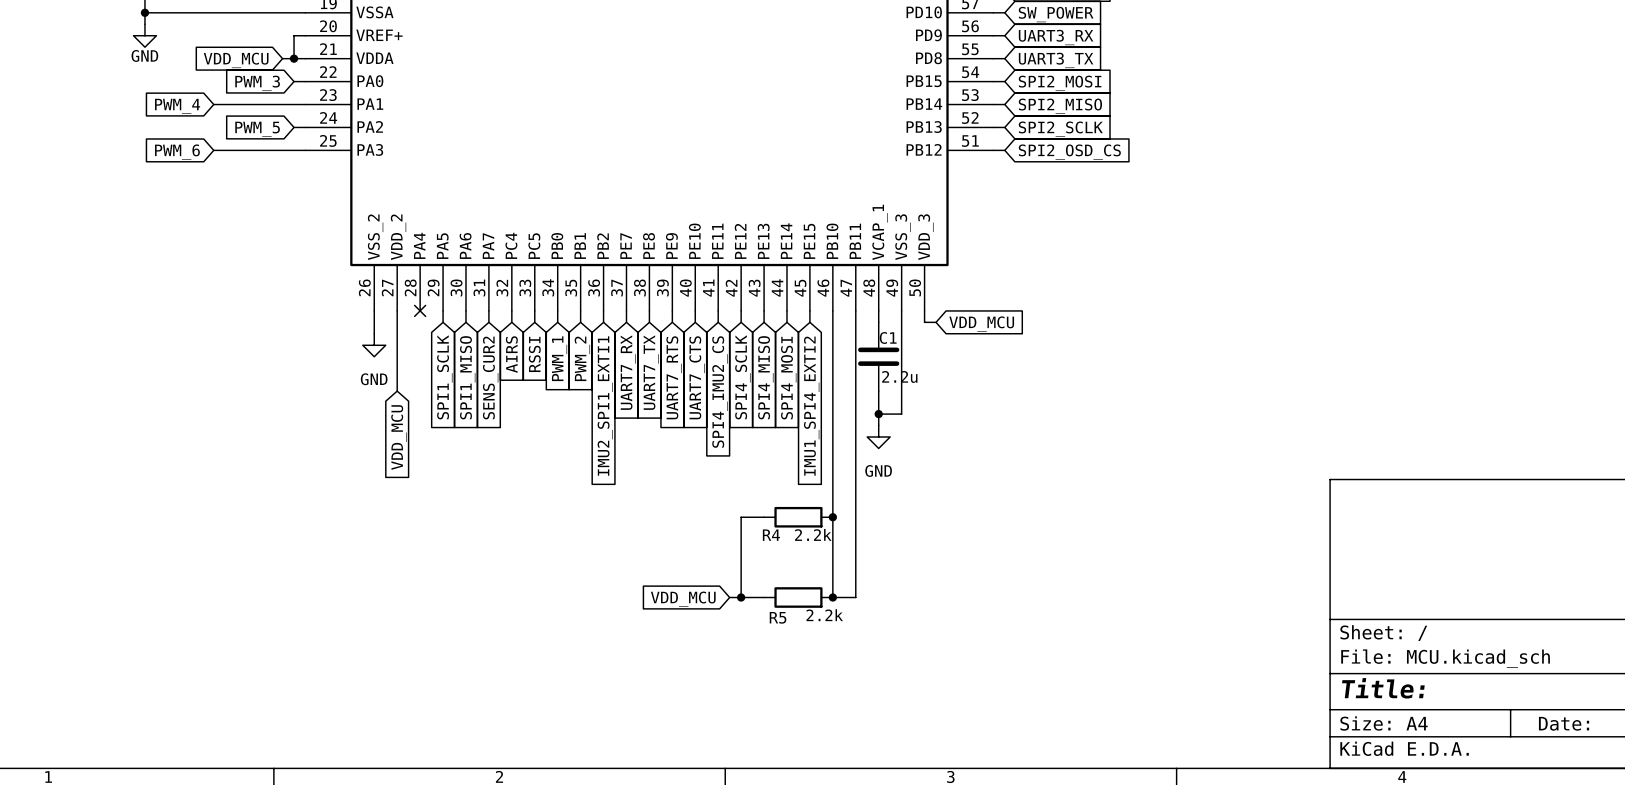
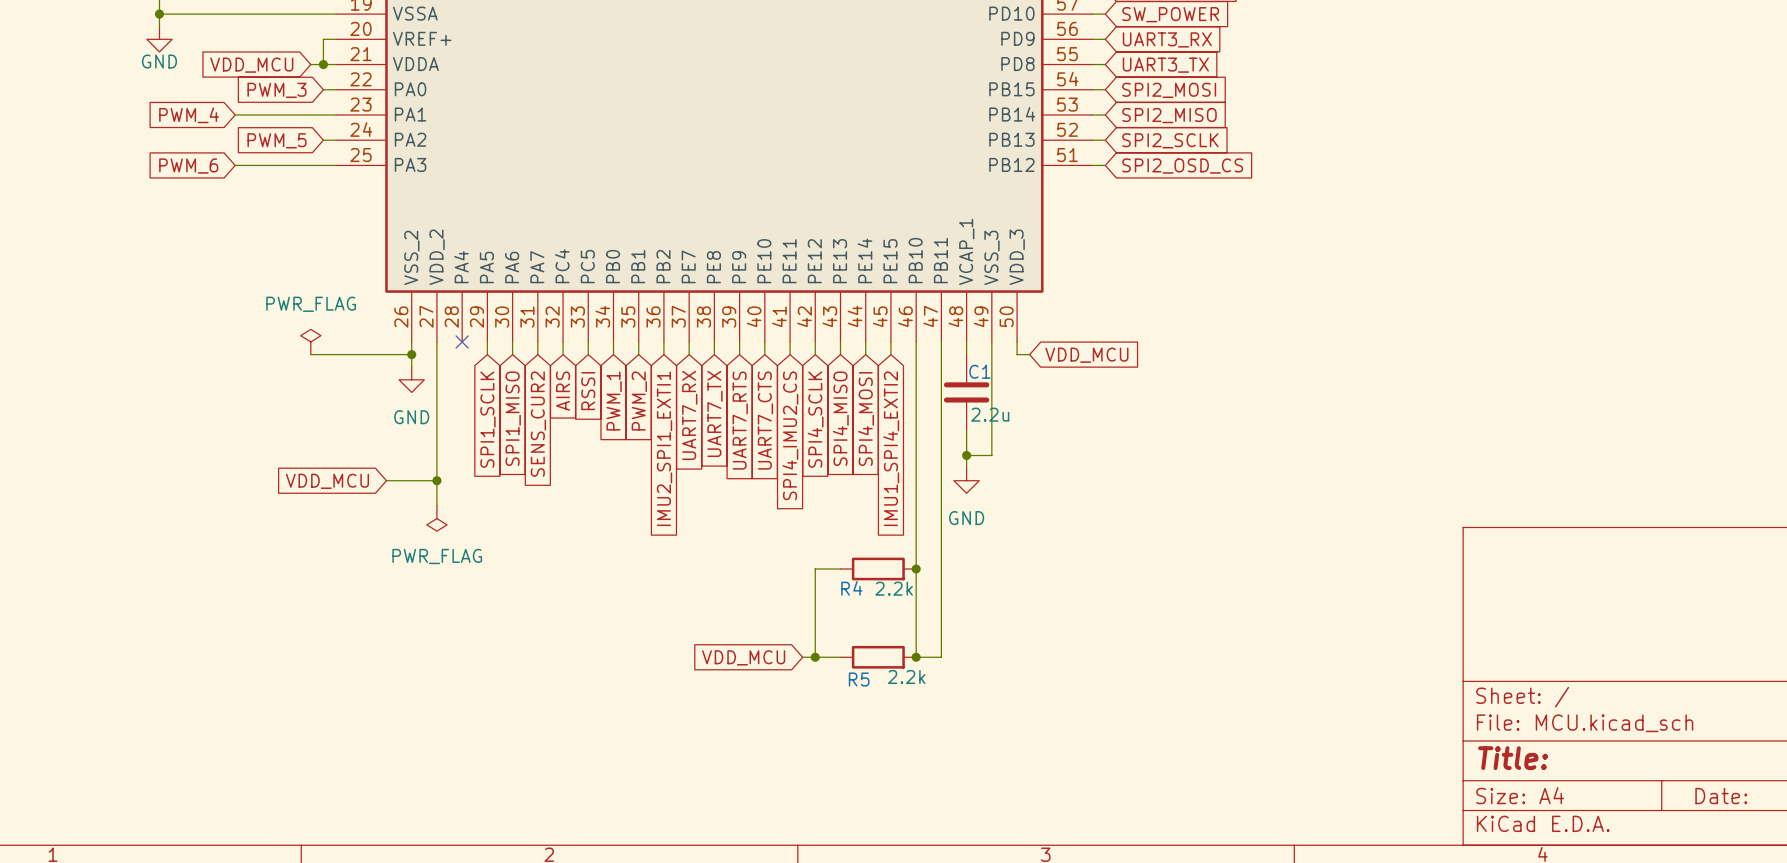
power symbol: none -> PWR_FLAG (310, 341)
wire: none -> (310, 354) (411, 354)
junction: none -> (411, 354)
wire: none -> (436, 430) (436, 505)
wire: none -> (386, 480) (436, 480)
junction: none -> (436, 480)
global label rotation: 0° (398, 437) -> 90° clockwise (327, 481)
power symbol: none -> PWR_FLAG (436, 518)

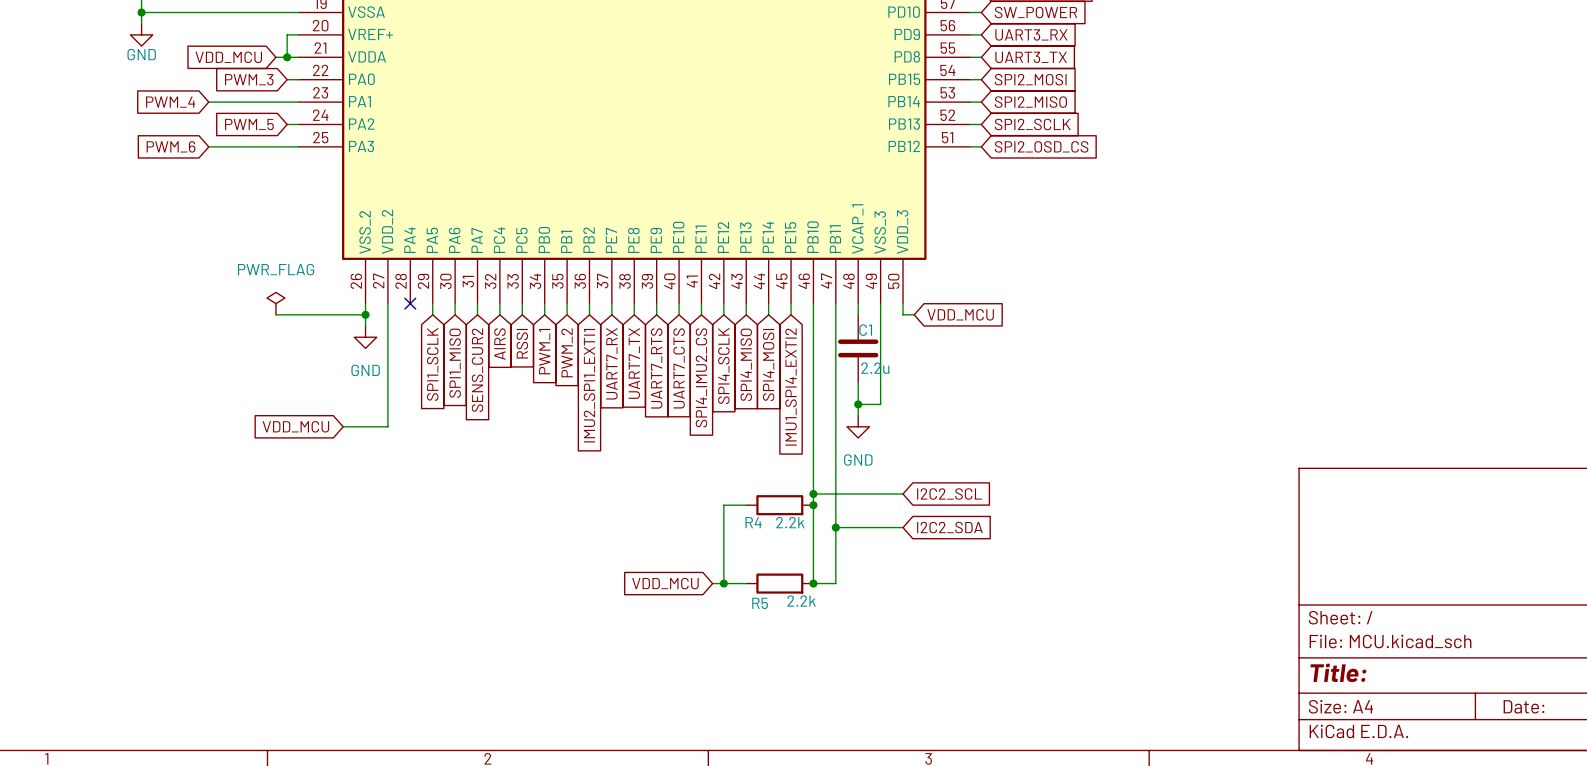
wire: (436, 480) (436, 505) -> none
junction: (436, 480) -> none
power symbol: PWR_FLAG (436, 518) -> none
wire: none -> (813, 493) (903, 493)
junction: none -> (813, 493)
global label: none -> I2C2_SCL (949, 494)
wire: none -> (835, 527) (903, 527)
junction: none -> (835, 527)
global label: none -> I2C2_SDA (949, 527)

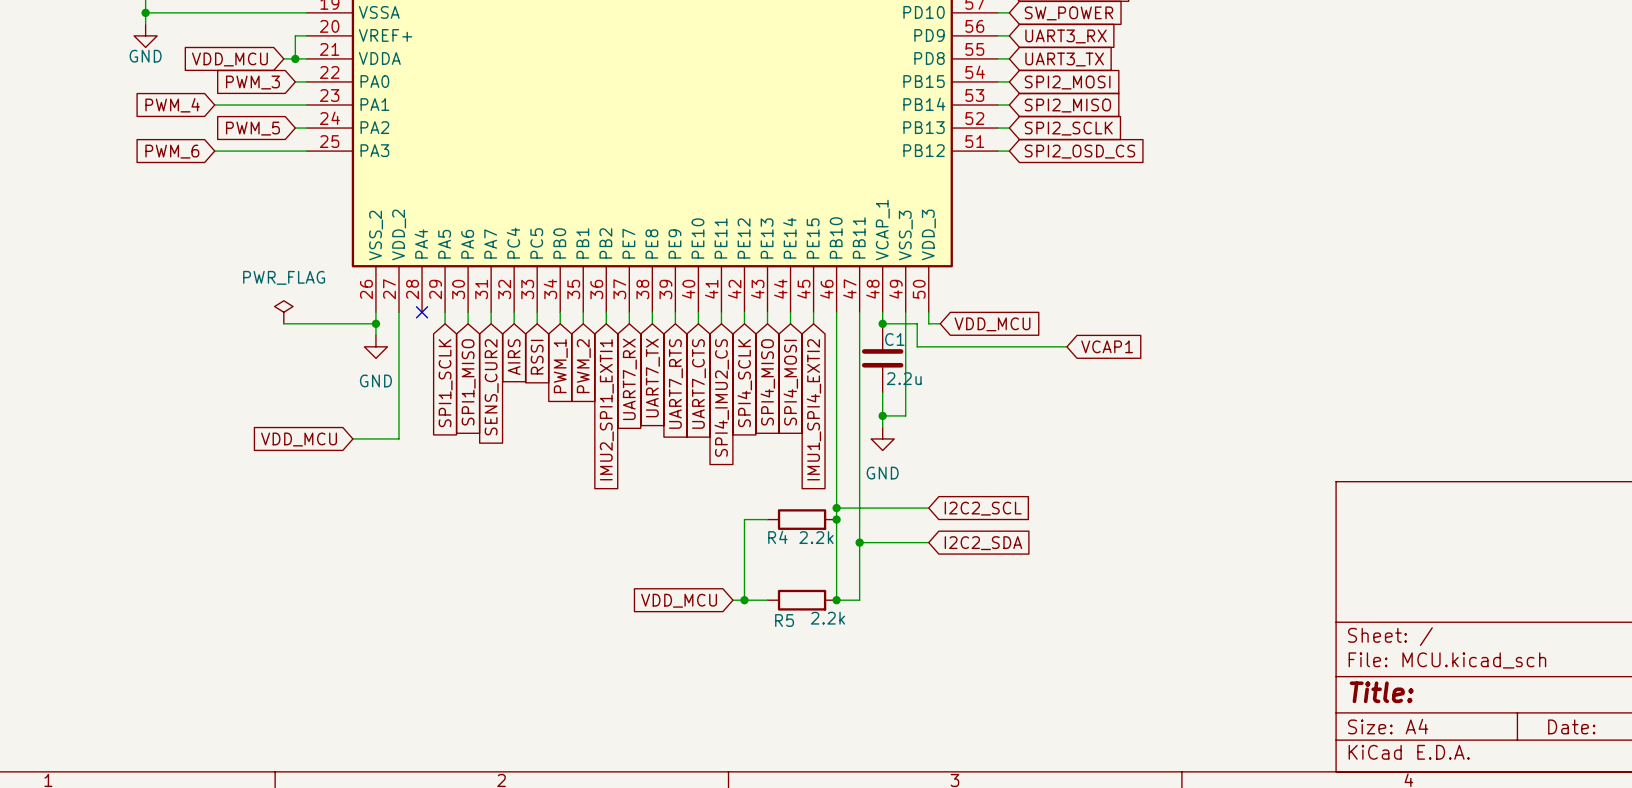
wire: none -> (882, 323) (917, 323) (917, 346) (1066, 346)
junction: none -> (882, 323)
global label: none -> VCAP1 (1107, 346)

